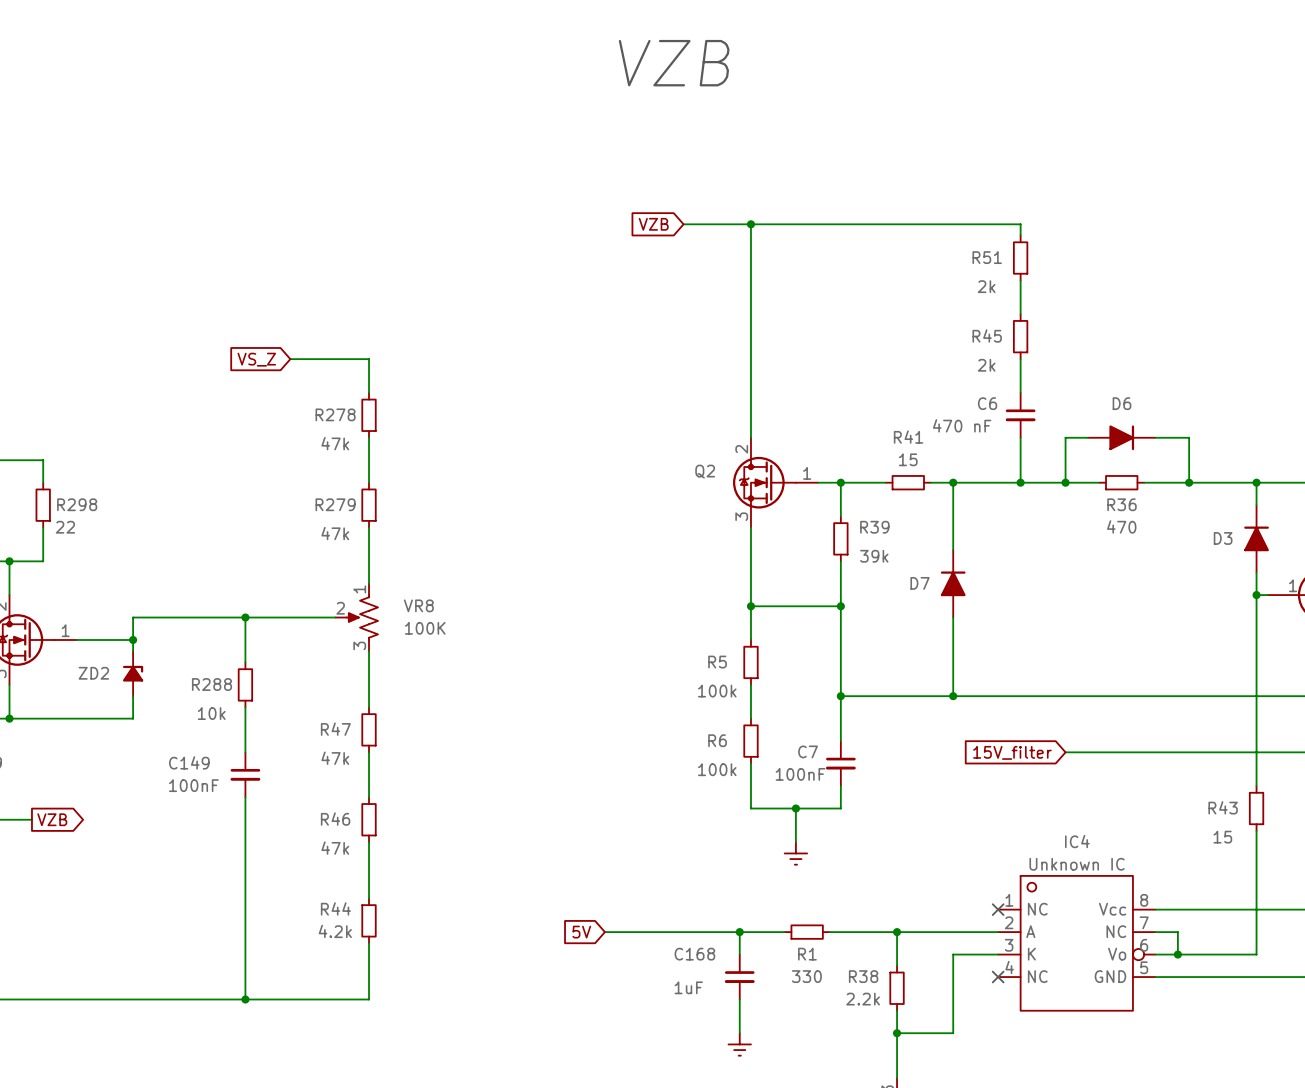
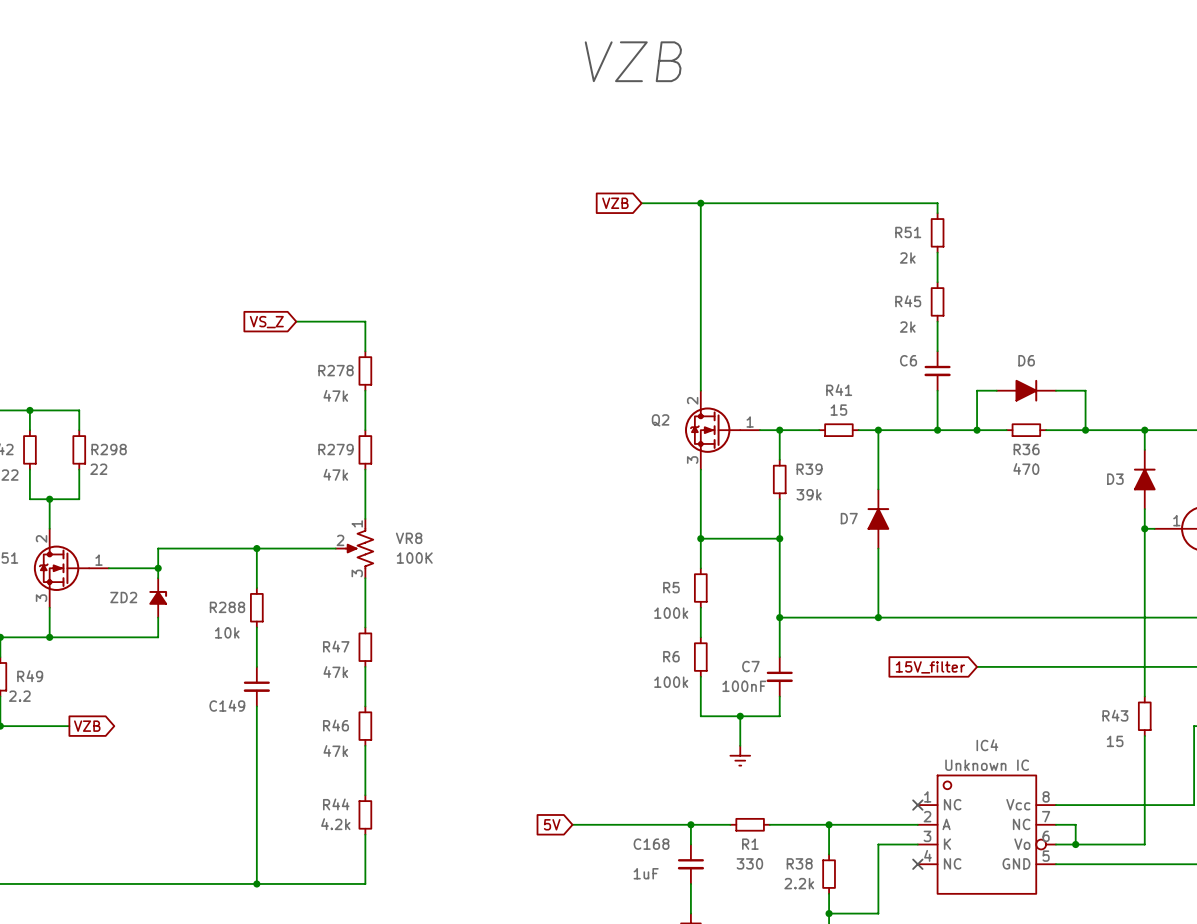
C6 value: 470 nF (962, 425) -> none
C149 name position: C149 (189, 762) -> C149 (227, 705)
C149 value: 100nF (193, 785) -> none

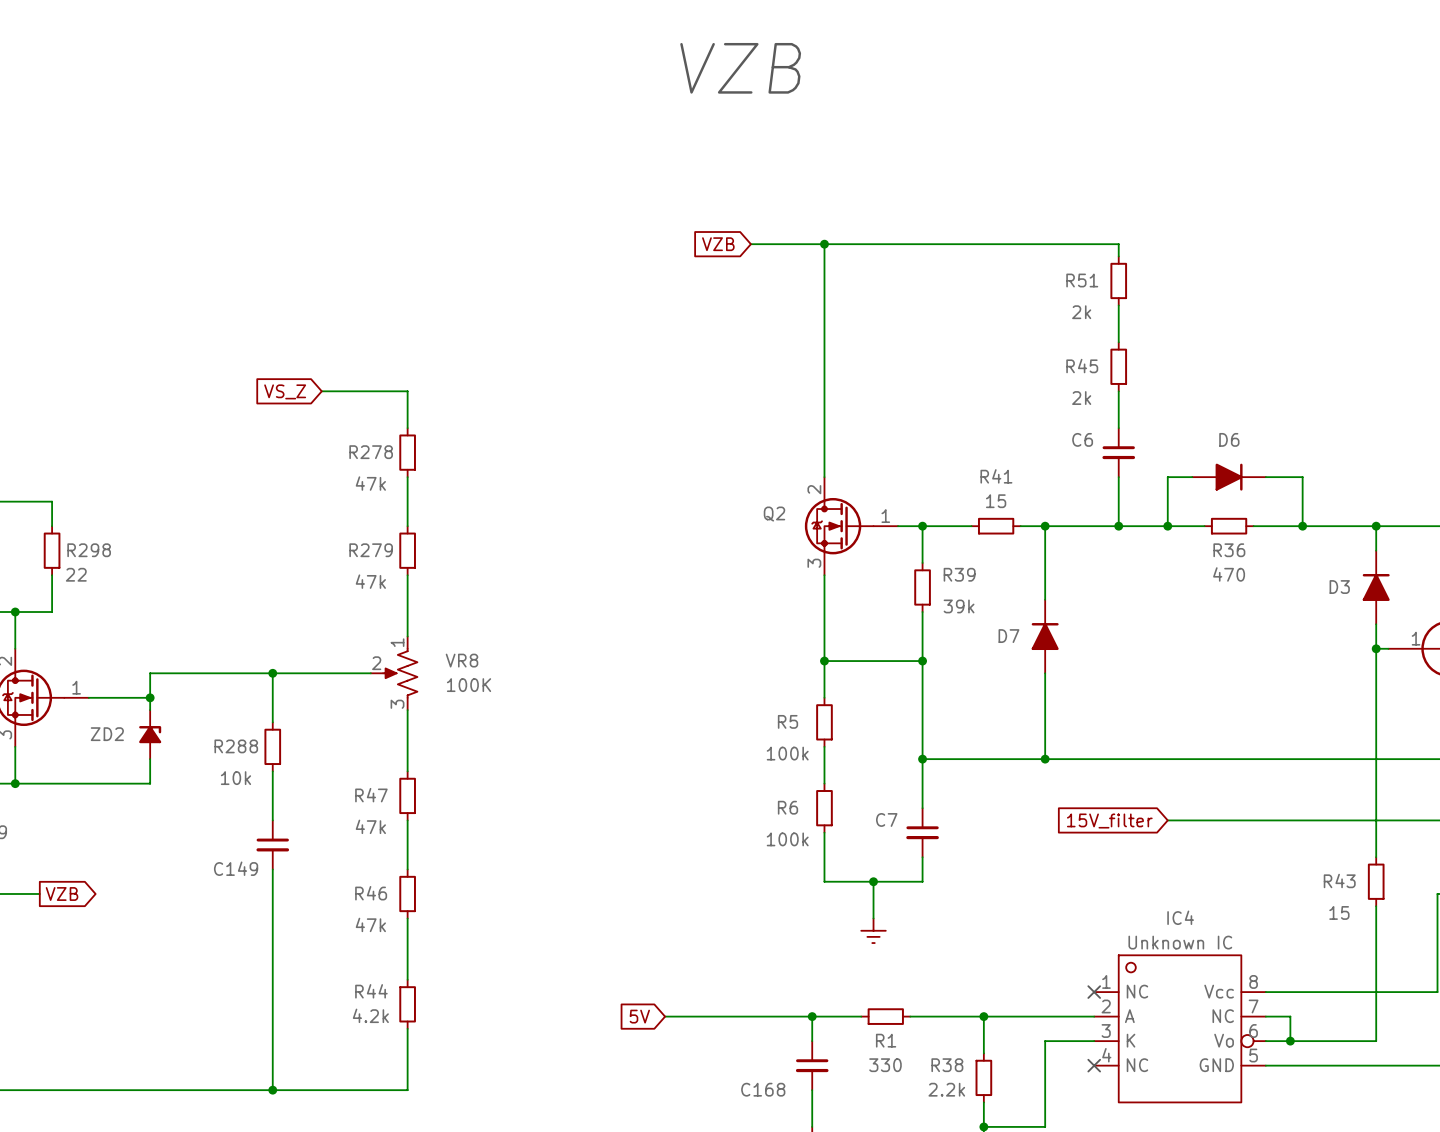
C7 value: 100nF (744, 686) -> none
C168 name position: C168 (651, 844) -> C168 (763, 1089)
C168 value: 1uF (646, 873) -> none

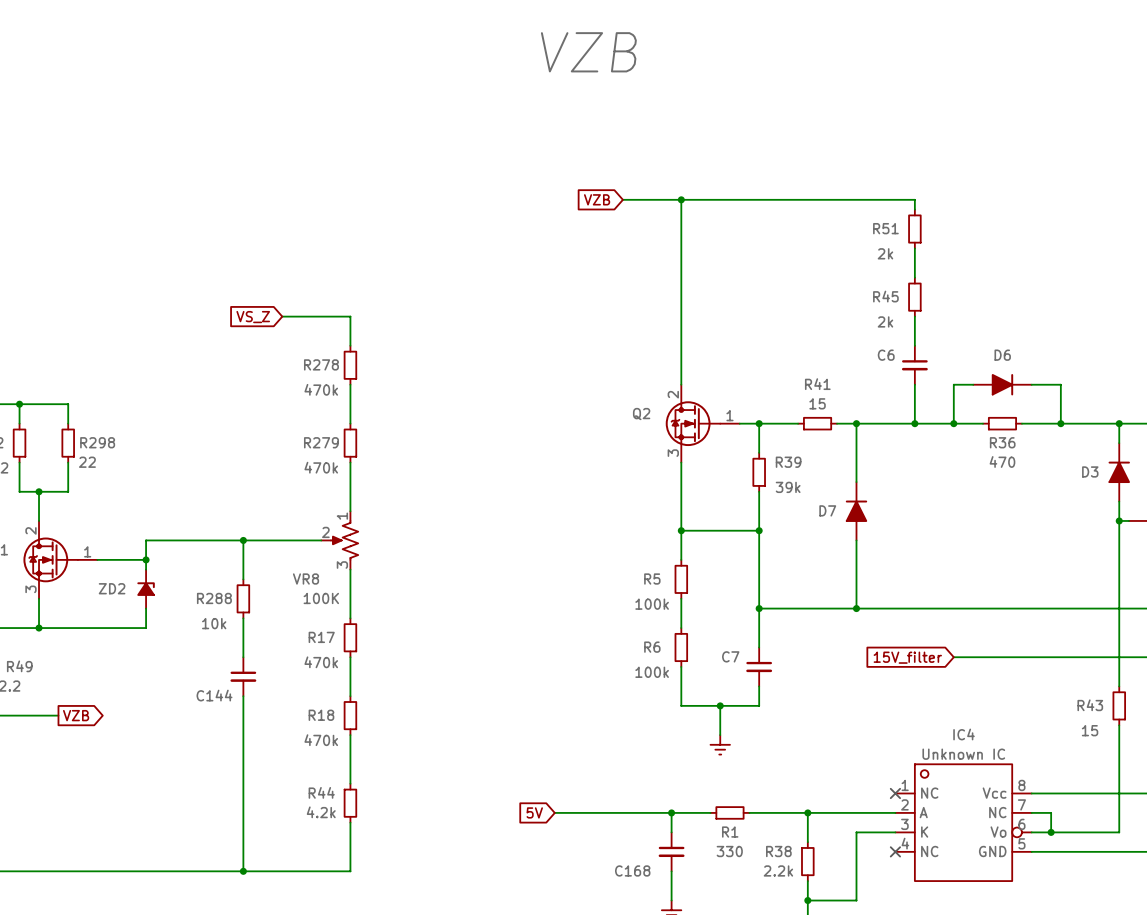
label: none -> VZB (588, 52)
text: VZB (740, 68) -> none
R278 value: 47k (370, 483) -> 470k (321, 389)
R279 value: 47k (370, 581) -> 470k (321, 467)
VR8 name position: VR8 (462, 660) -> VR8 (306, 579)
VR8 value position: 100K (469, 685) -> 100K (321, 598)
R47 name: R47 (371, 795) -> R17 (321, 637)
R47 value: 47k (370, 826) -> 470k (321, 662)
C149 name: C149 (236, 868) -> C144 (214, 695)
R46 name: R46 (371, 893) -> R18 (321, 715)
R46 value: 47k (370, 924) -> 470k (321, 740)

